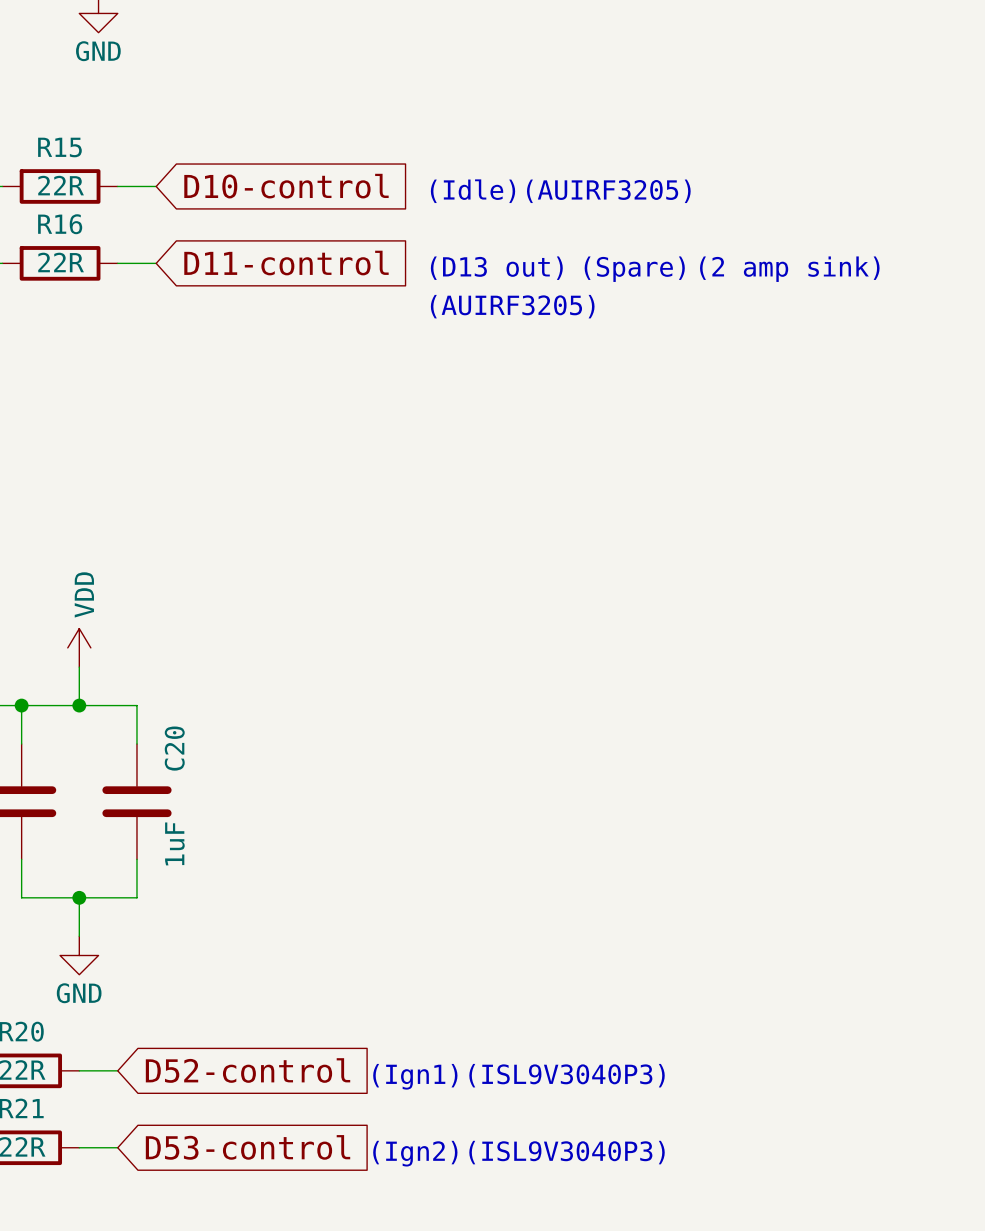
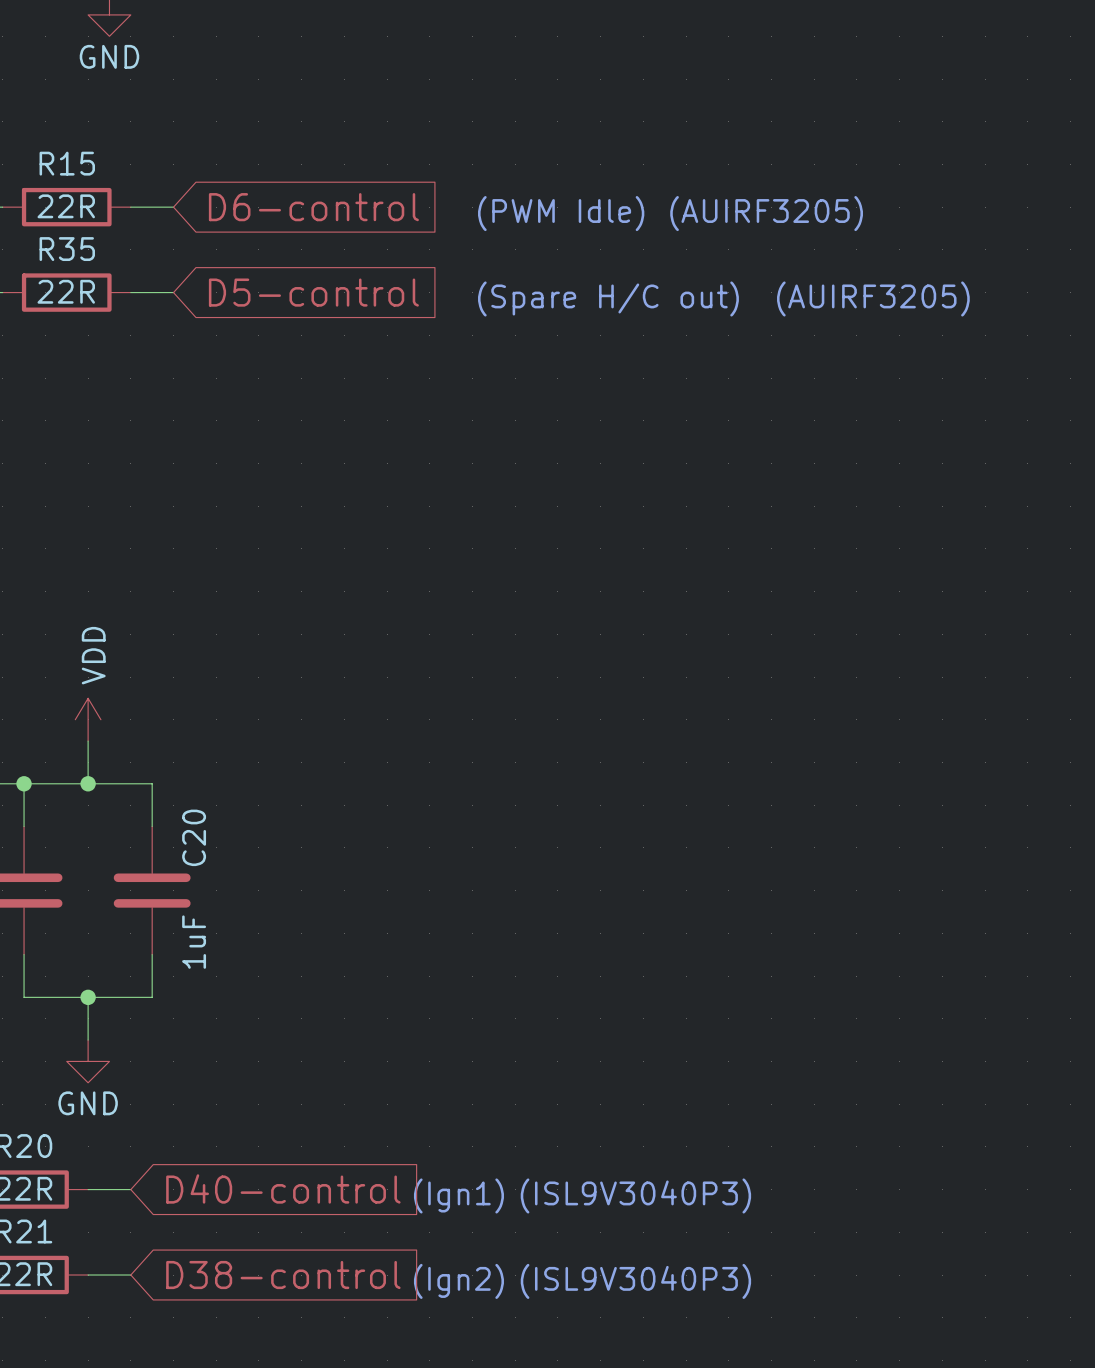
global label: D10-control (286, 186) -> D6-control (313, 207)
text: (Idle) (473, 191) -> (PWM Idle) (561, 213)
text position: (AUIRF3205) (608, 191) -> (AUIRF3205) (766, 213)
R16 name: R16 (60, 224) -> R35 (67, 249)
global label: D11-control (286, 263) -> D5-control (313, 292)
text: (D13 out) (496, 268) -> (Spare H/C out) (608, 298)
text: (Spare) (634, 269) -> none
text: (2 amp sink) (789, 269) -> (AUIRF3205) (873, 298)
text: (AUIRF3205) (512, 306) -> none
global label: D52-control (248, 1070) -> D40-control (283, 1188)
global label: D53-control (248, 1147) -> D38-control (283, 1275)

